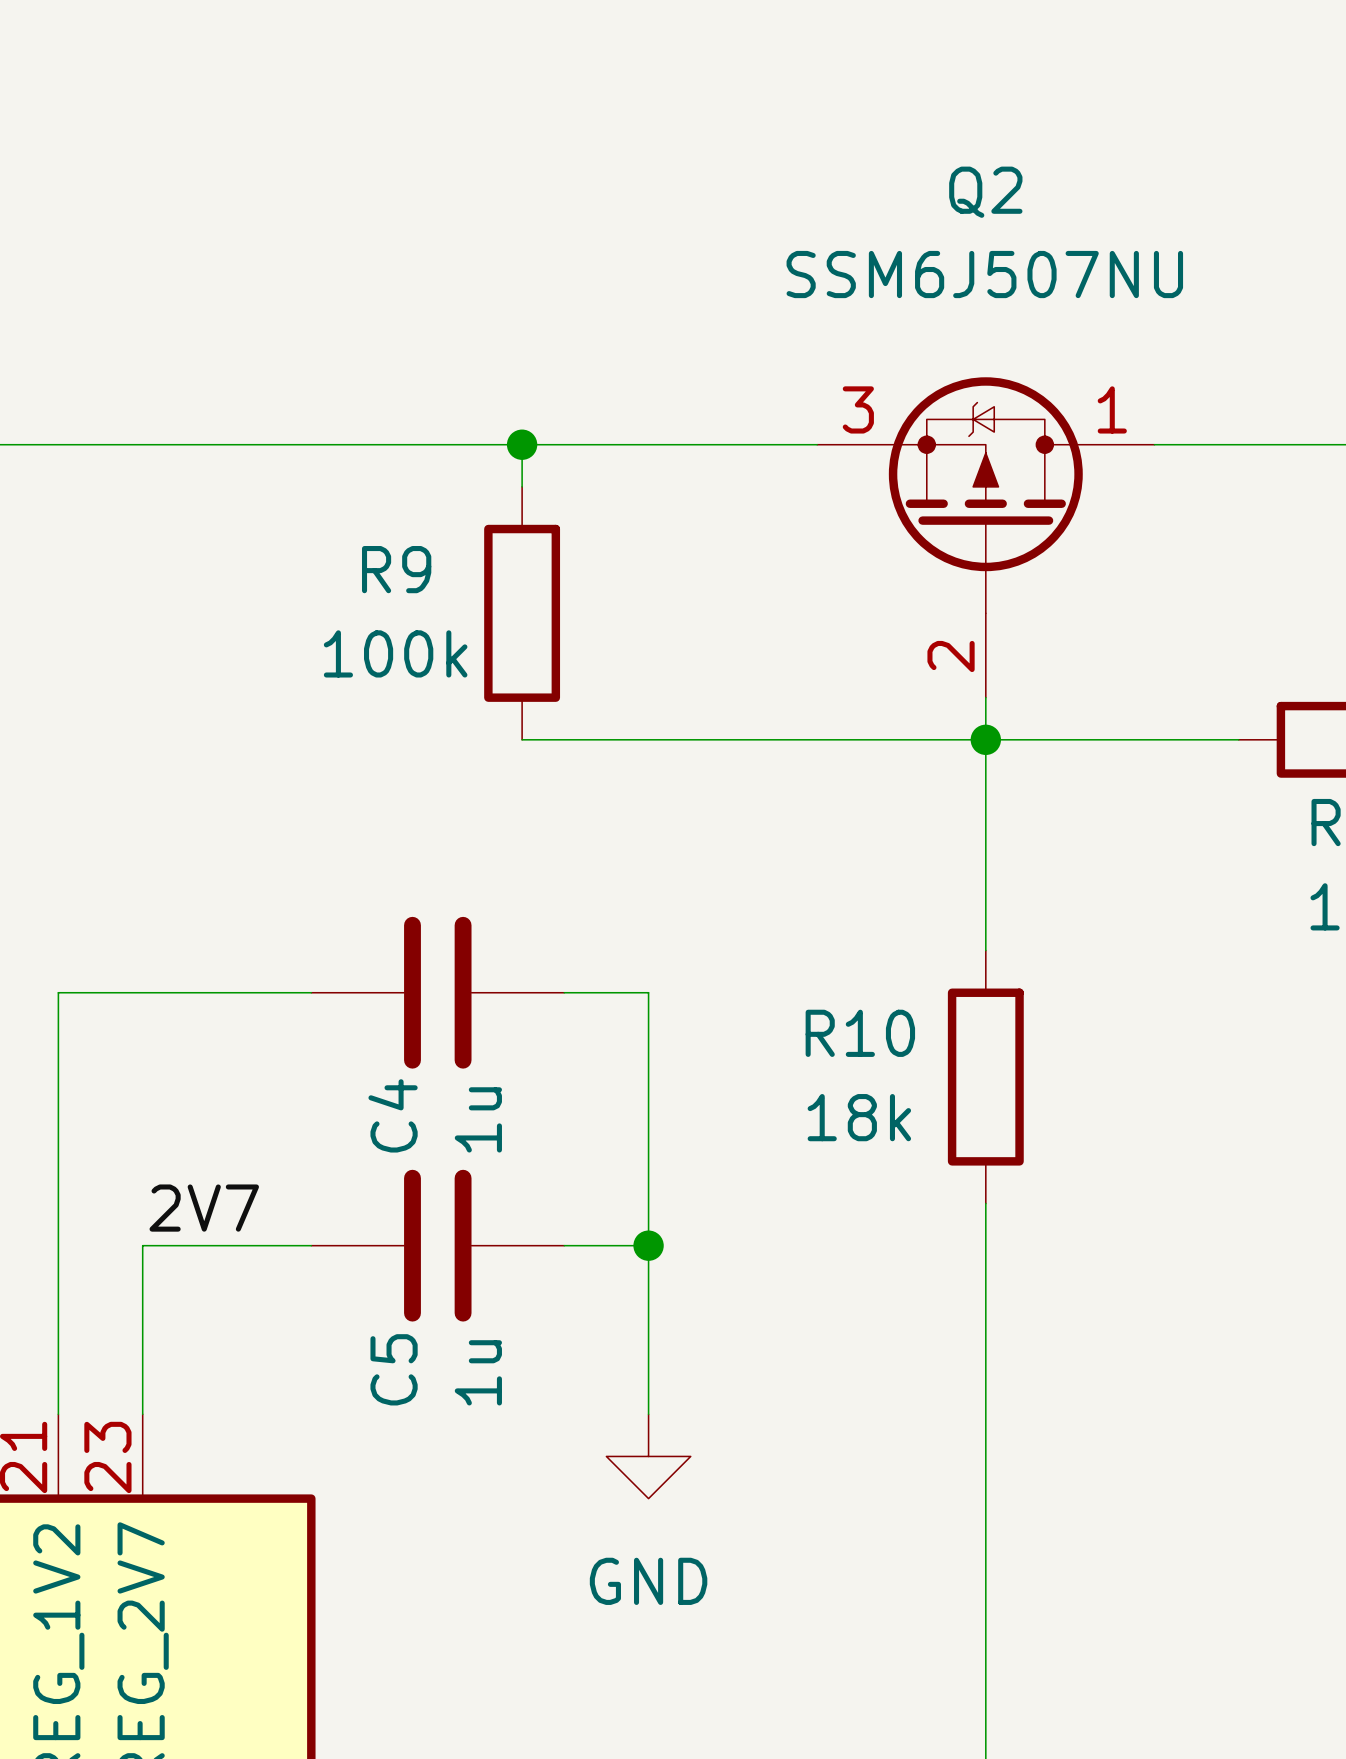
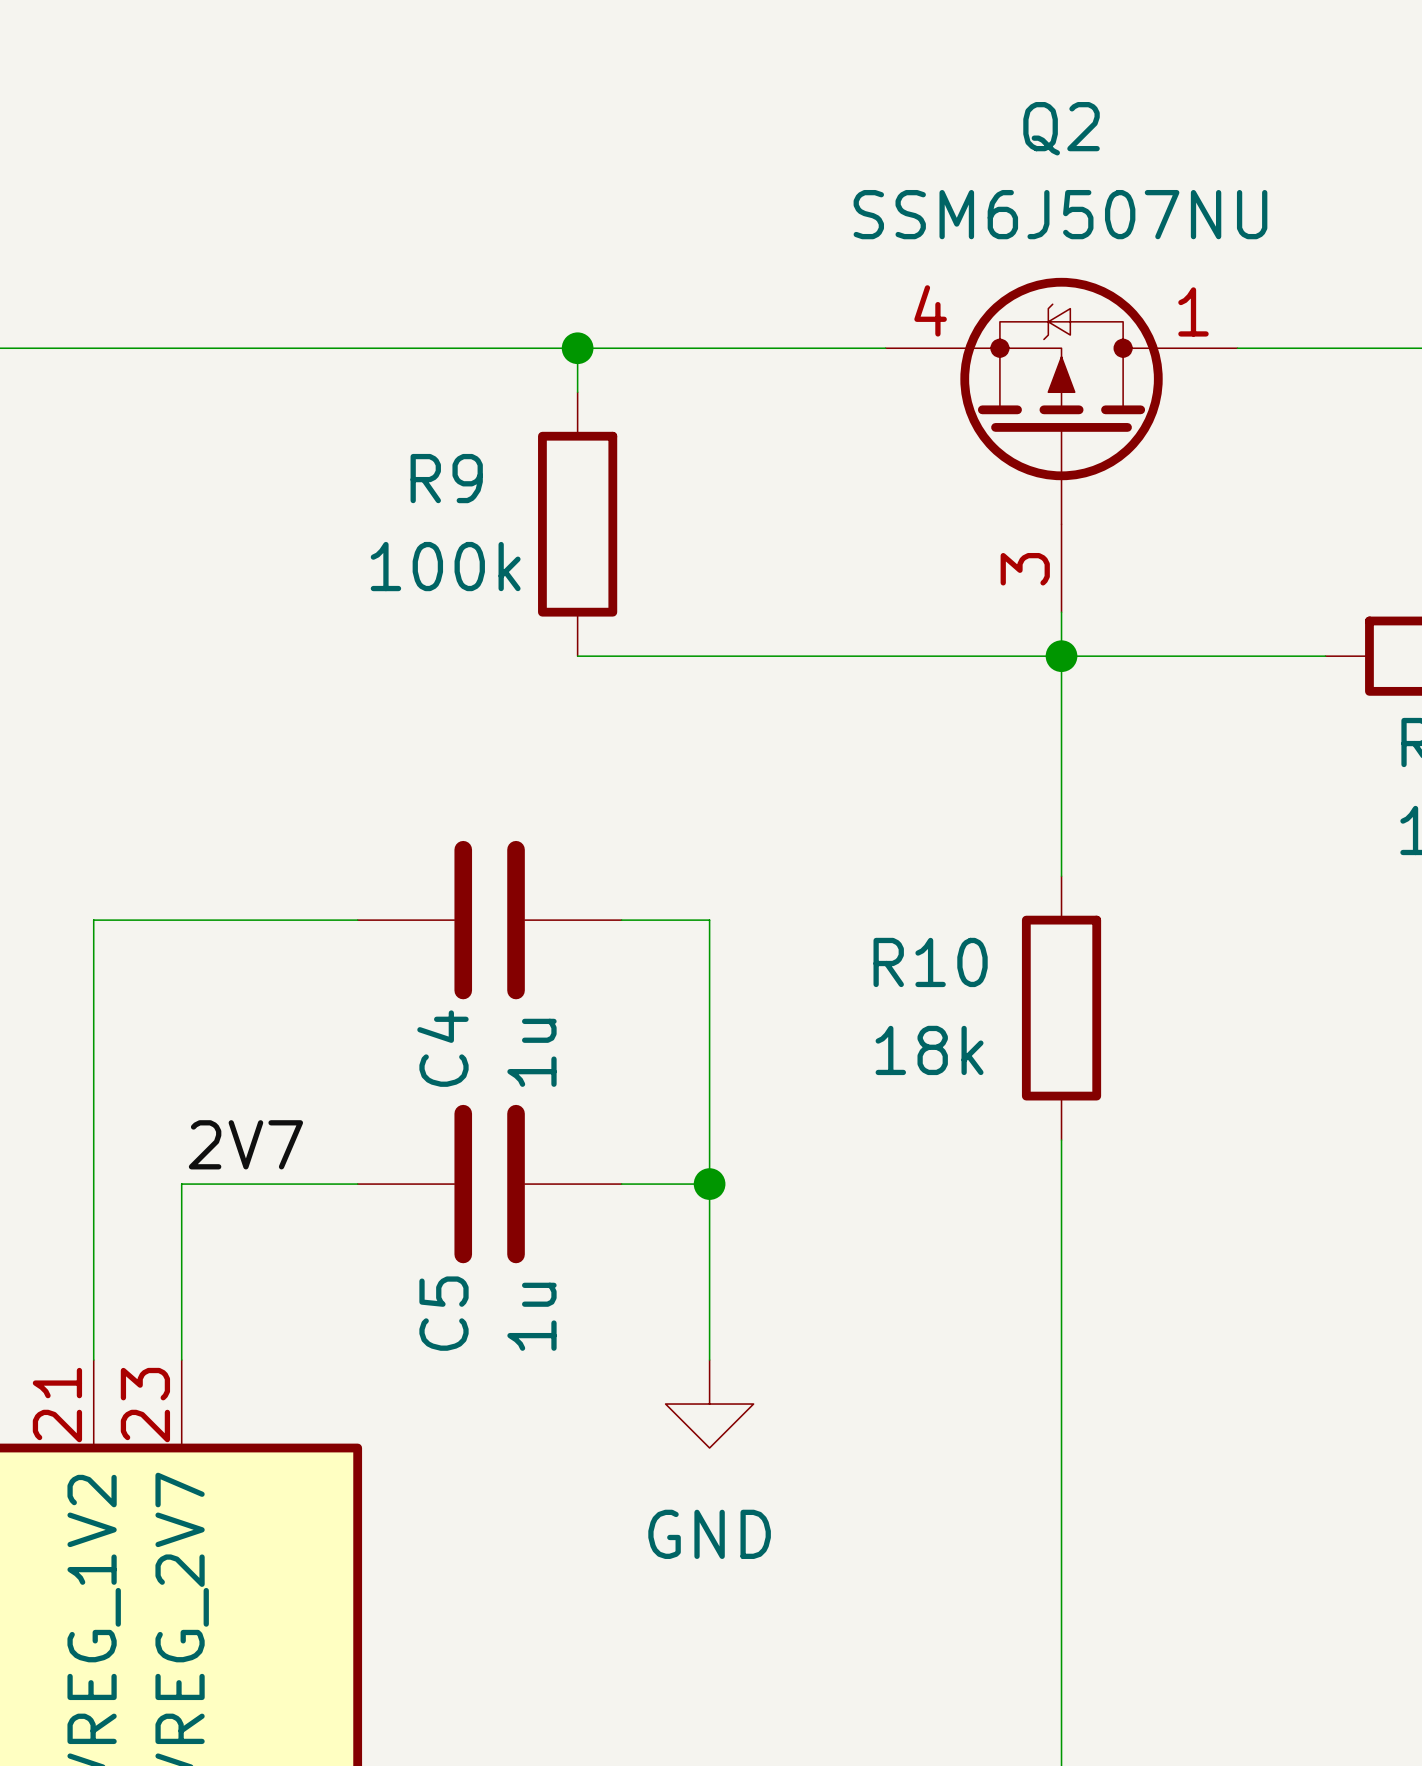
Q2 name position: Q2 (985, 192) -> Q2 (1061, 128)
Q2 value position: SSM6J507NU (984, 274) -> SSM6J507NU (1060, 214)
Q2 pin number: 3 (858, 409) -> 4 (930, 310)
Q2 pin number: 2 (951, 656) -> 3 (1025, 569)

